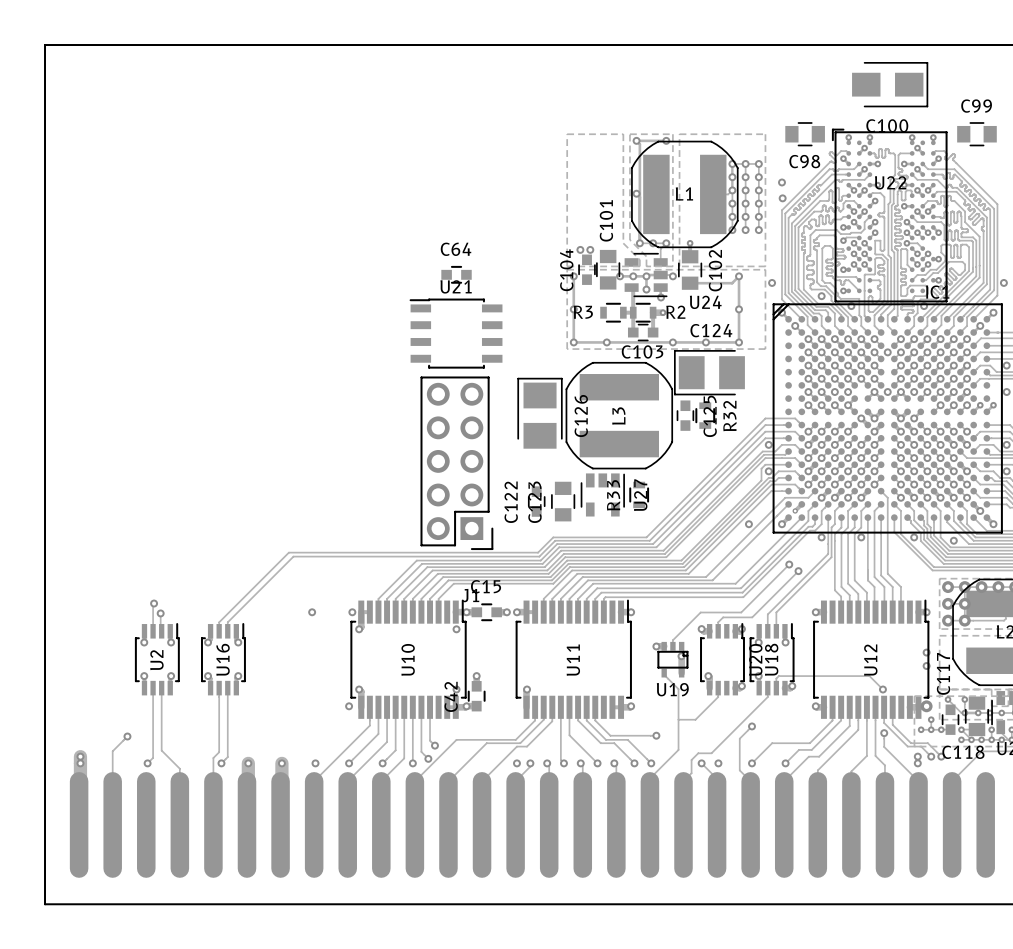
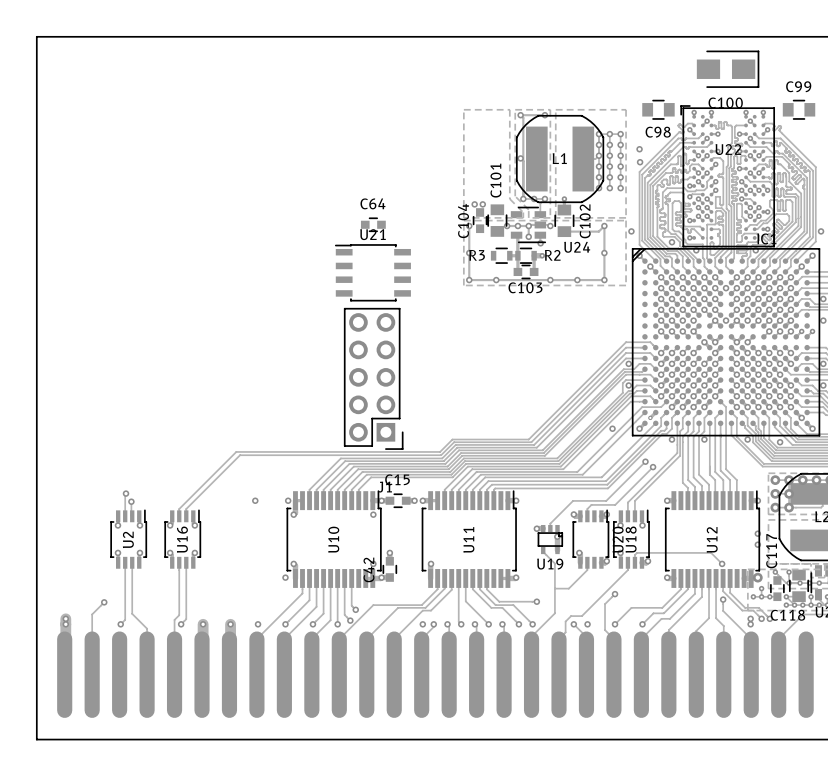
C124: (709, 372) -> none
C126: (540, 413) -> none
L3: (619, 415) -> none
C125: (685, 415) -> none
R32: (705, 415) -> none
U27: (602, 494) -> none
R33: (639, 494) -> none
C122: (536, 501) -> none
C123: (563, 501) -> none

